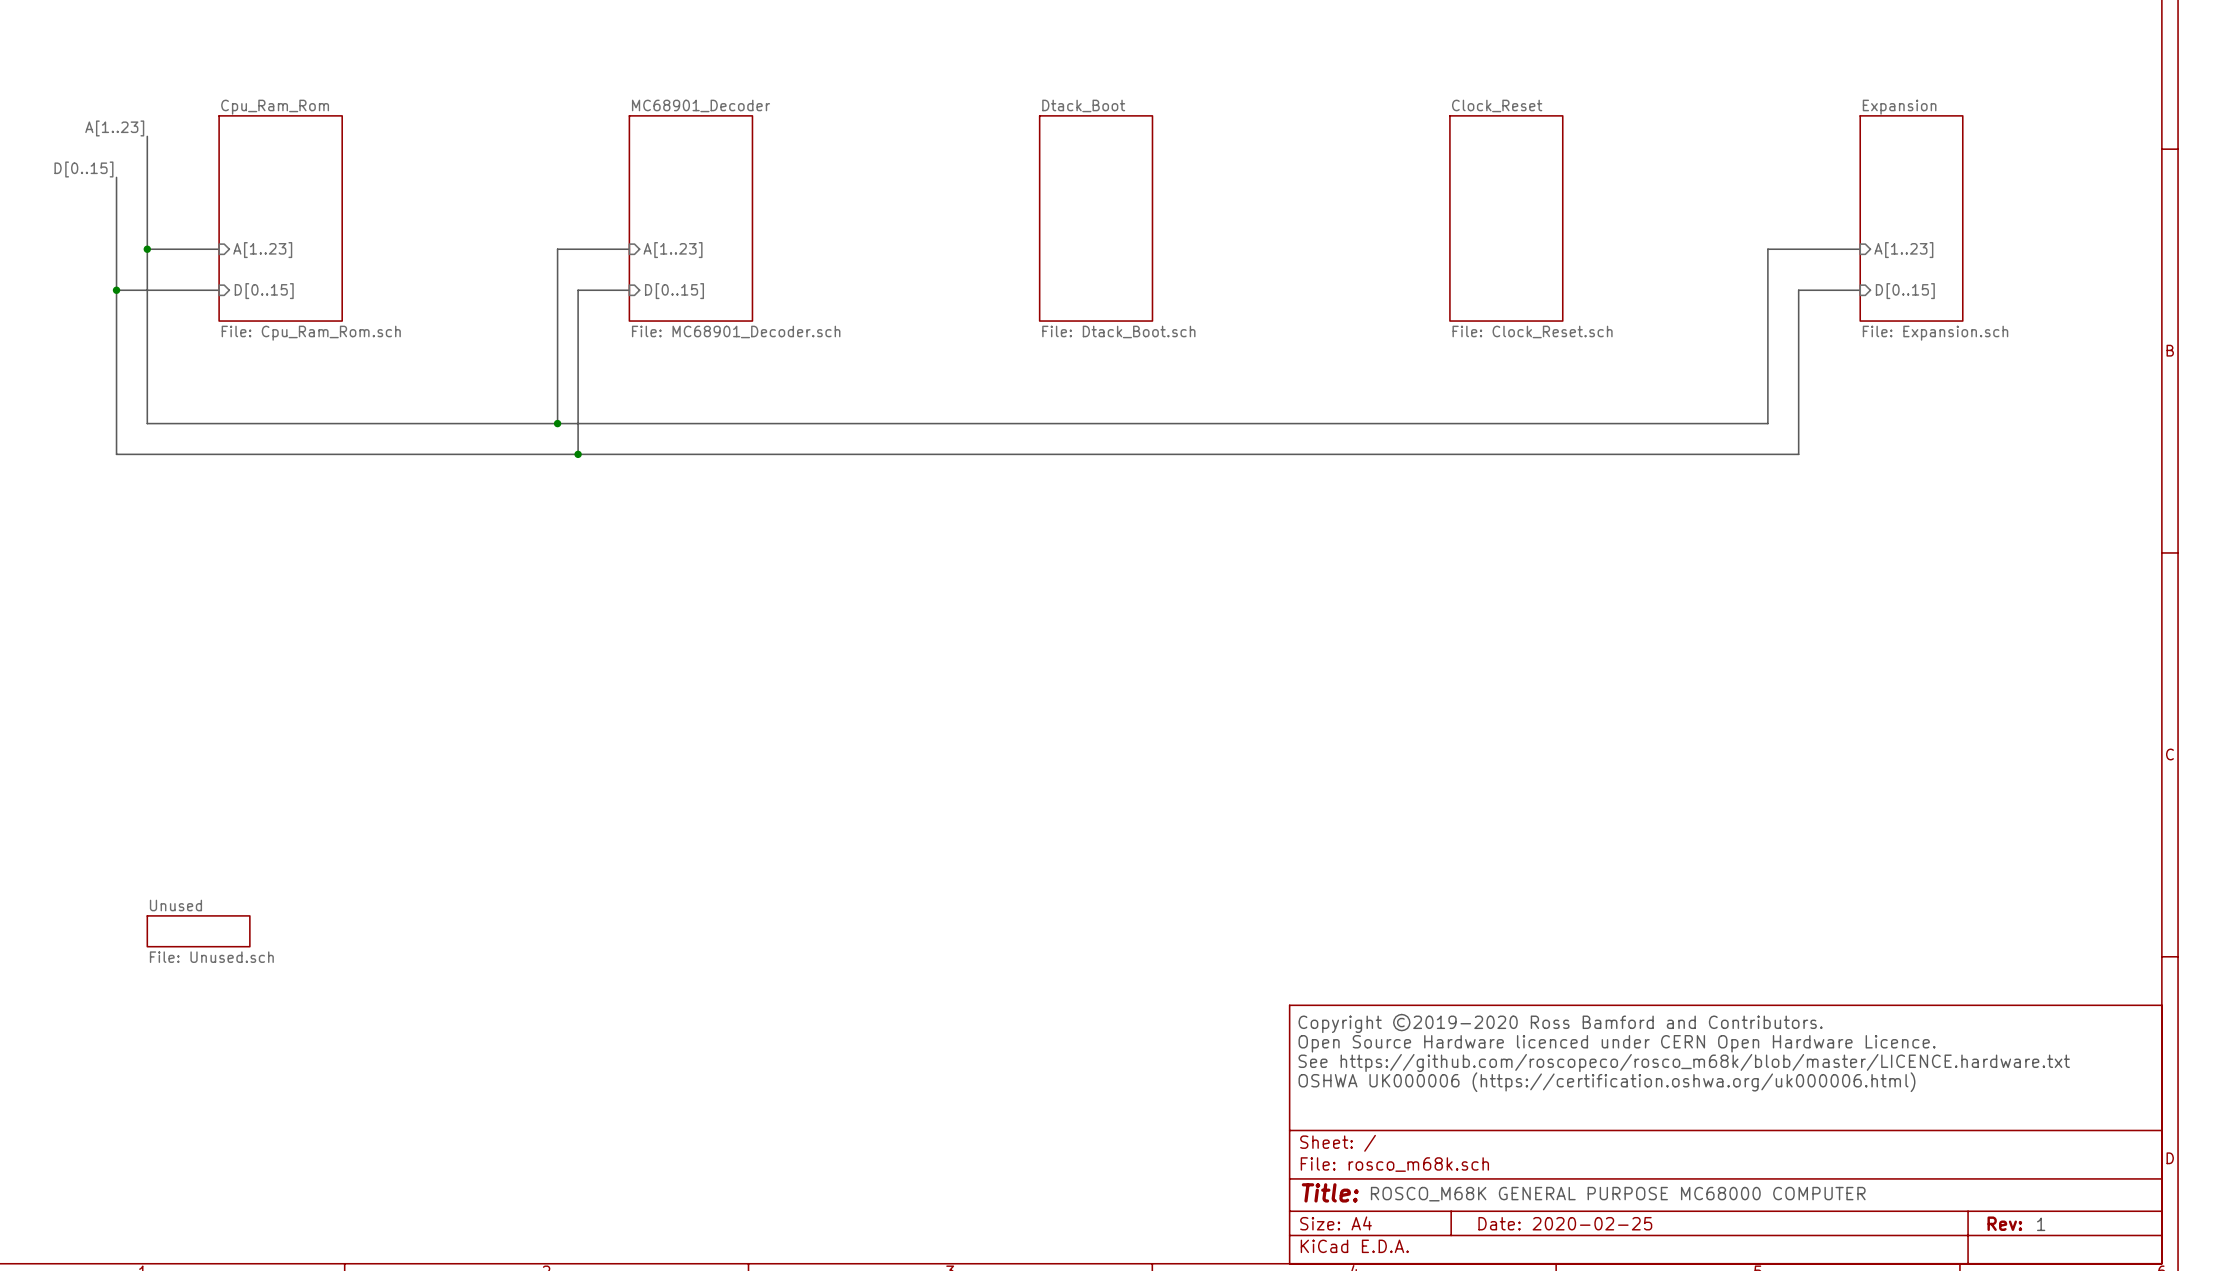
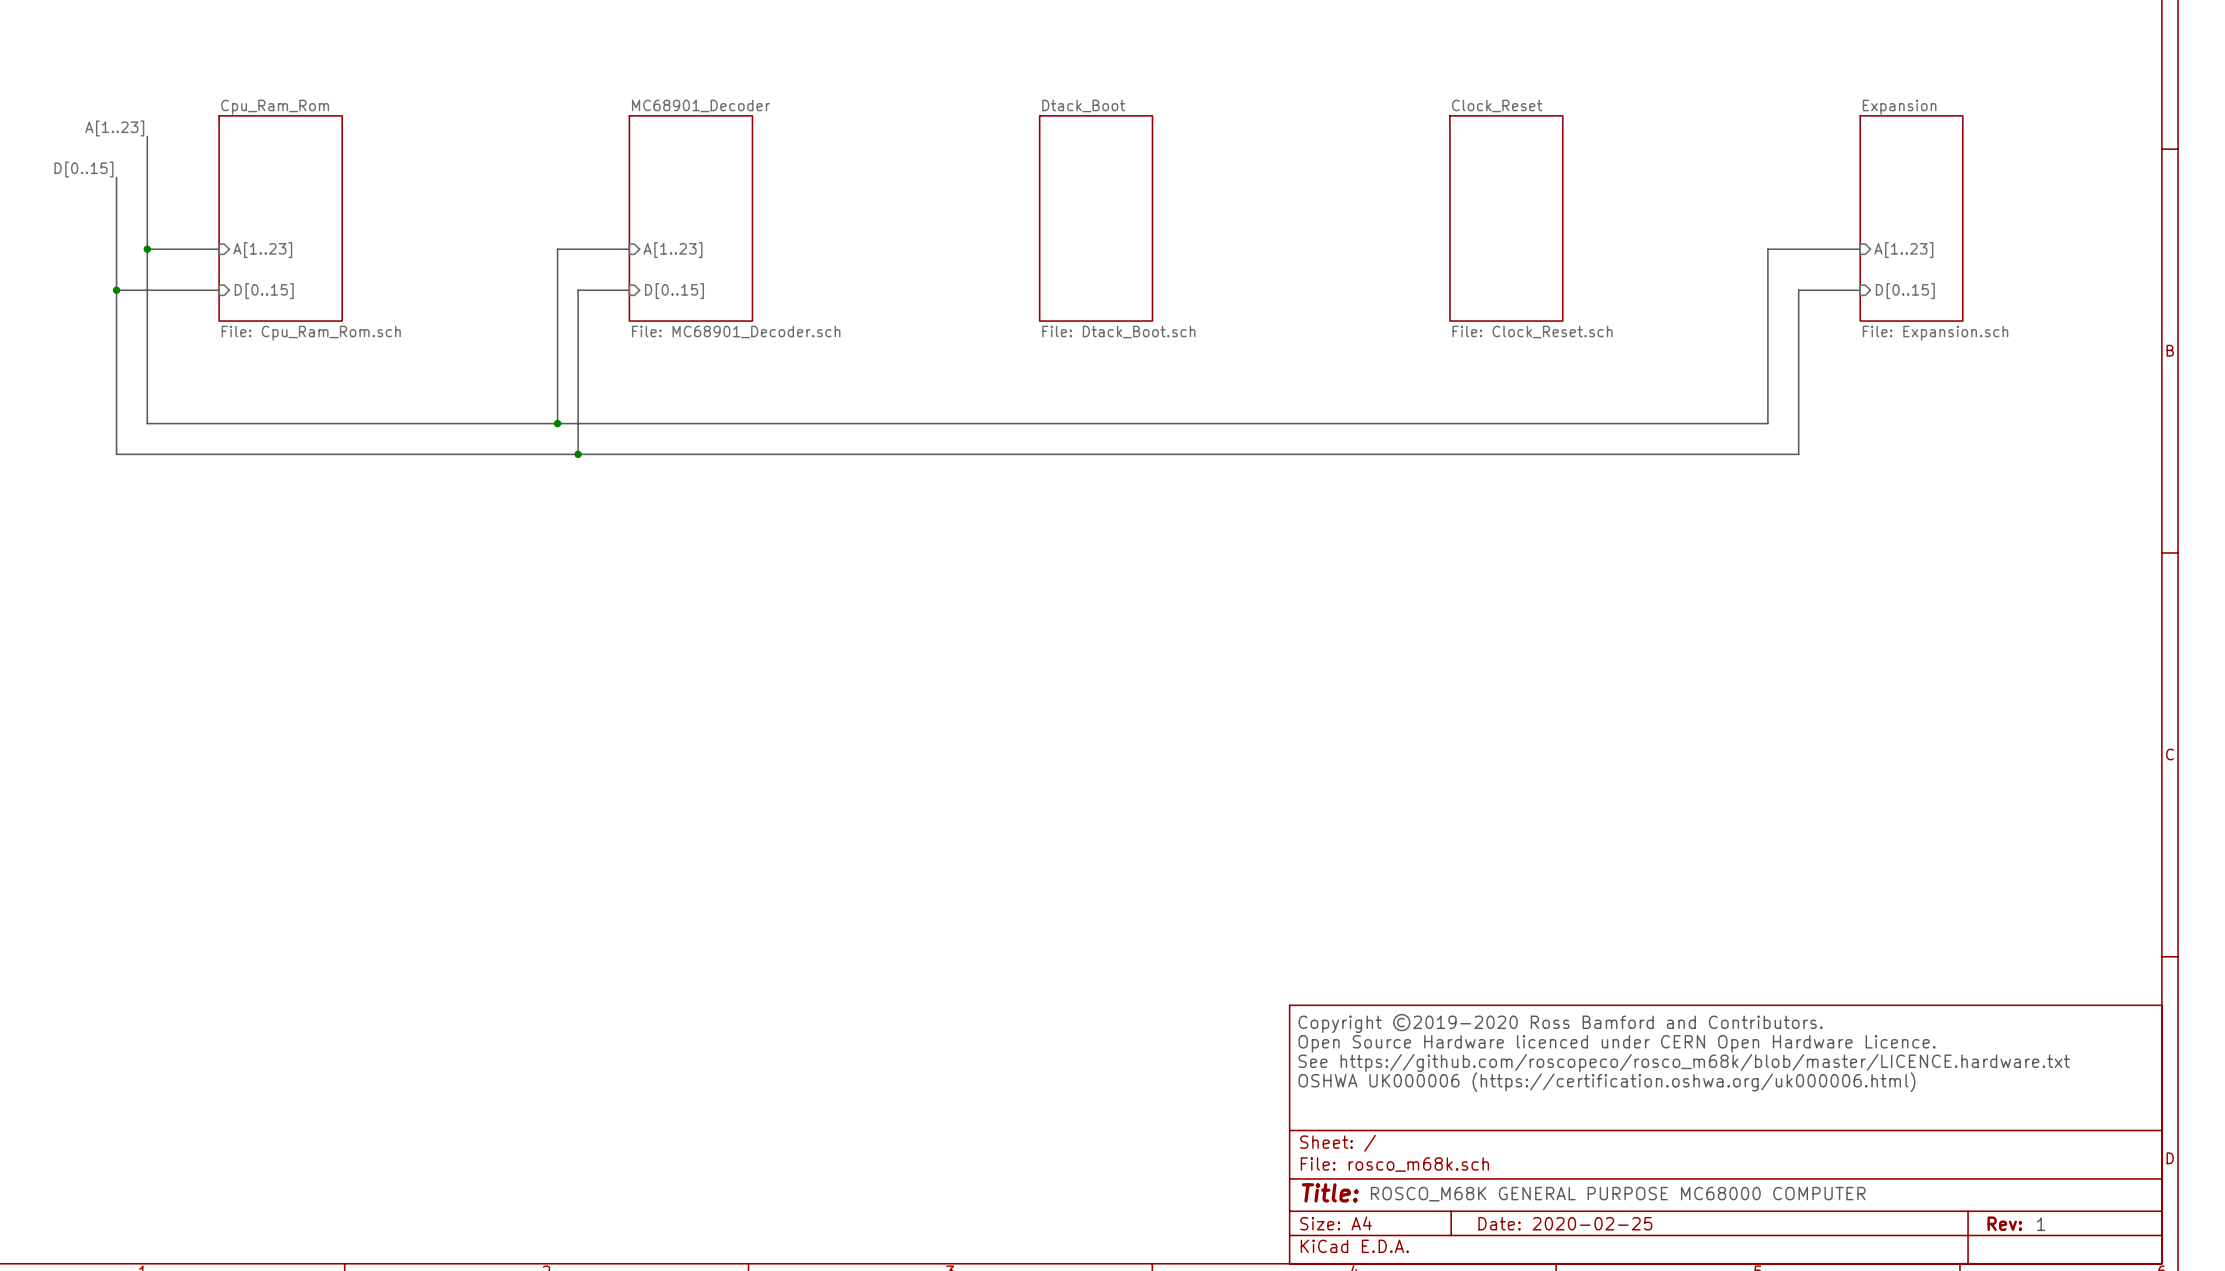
sheet Unused: File: Unused.sch (198, 931) -> none

